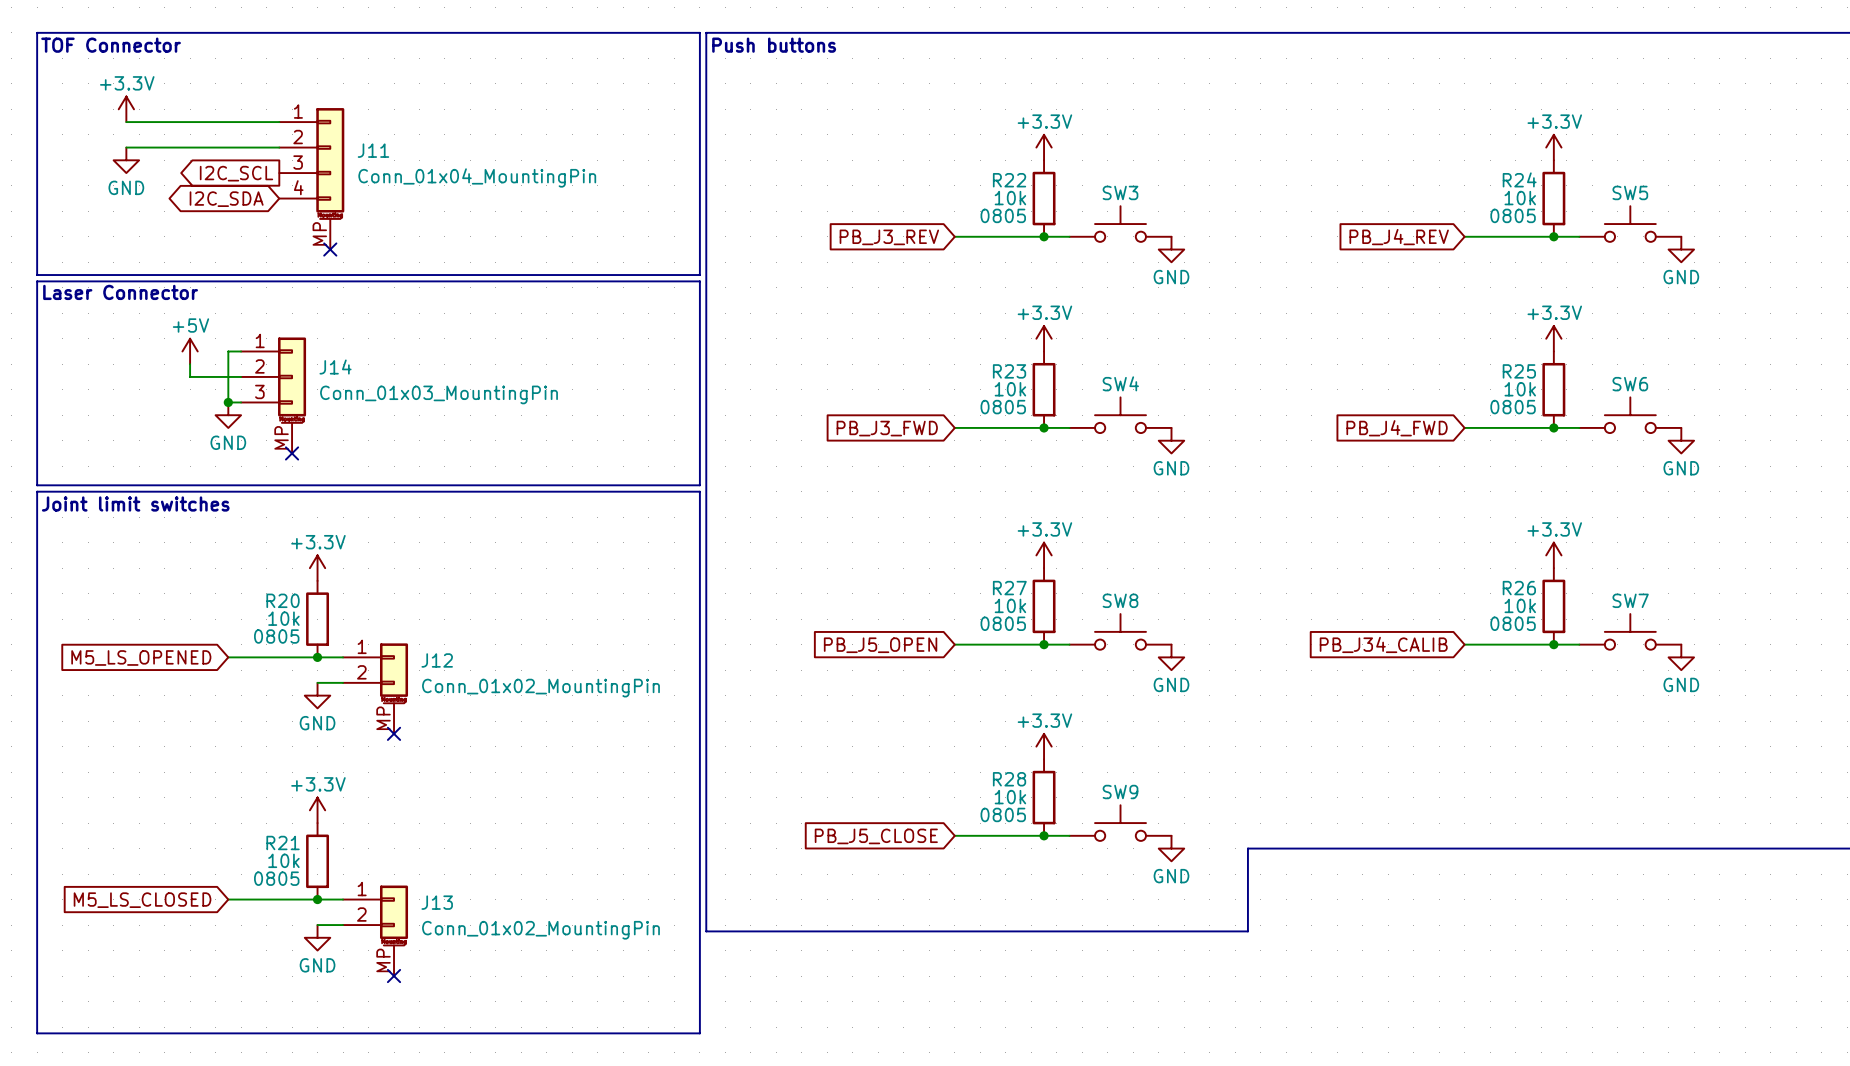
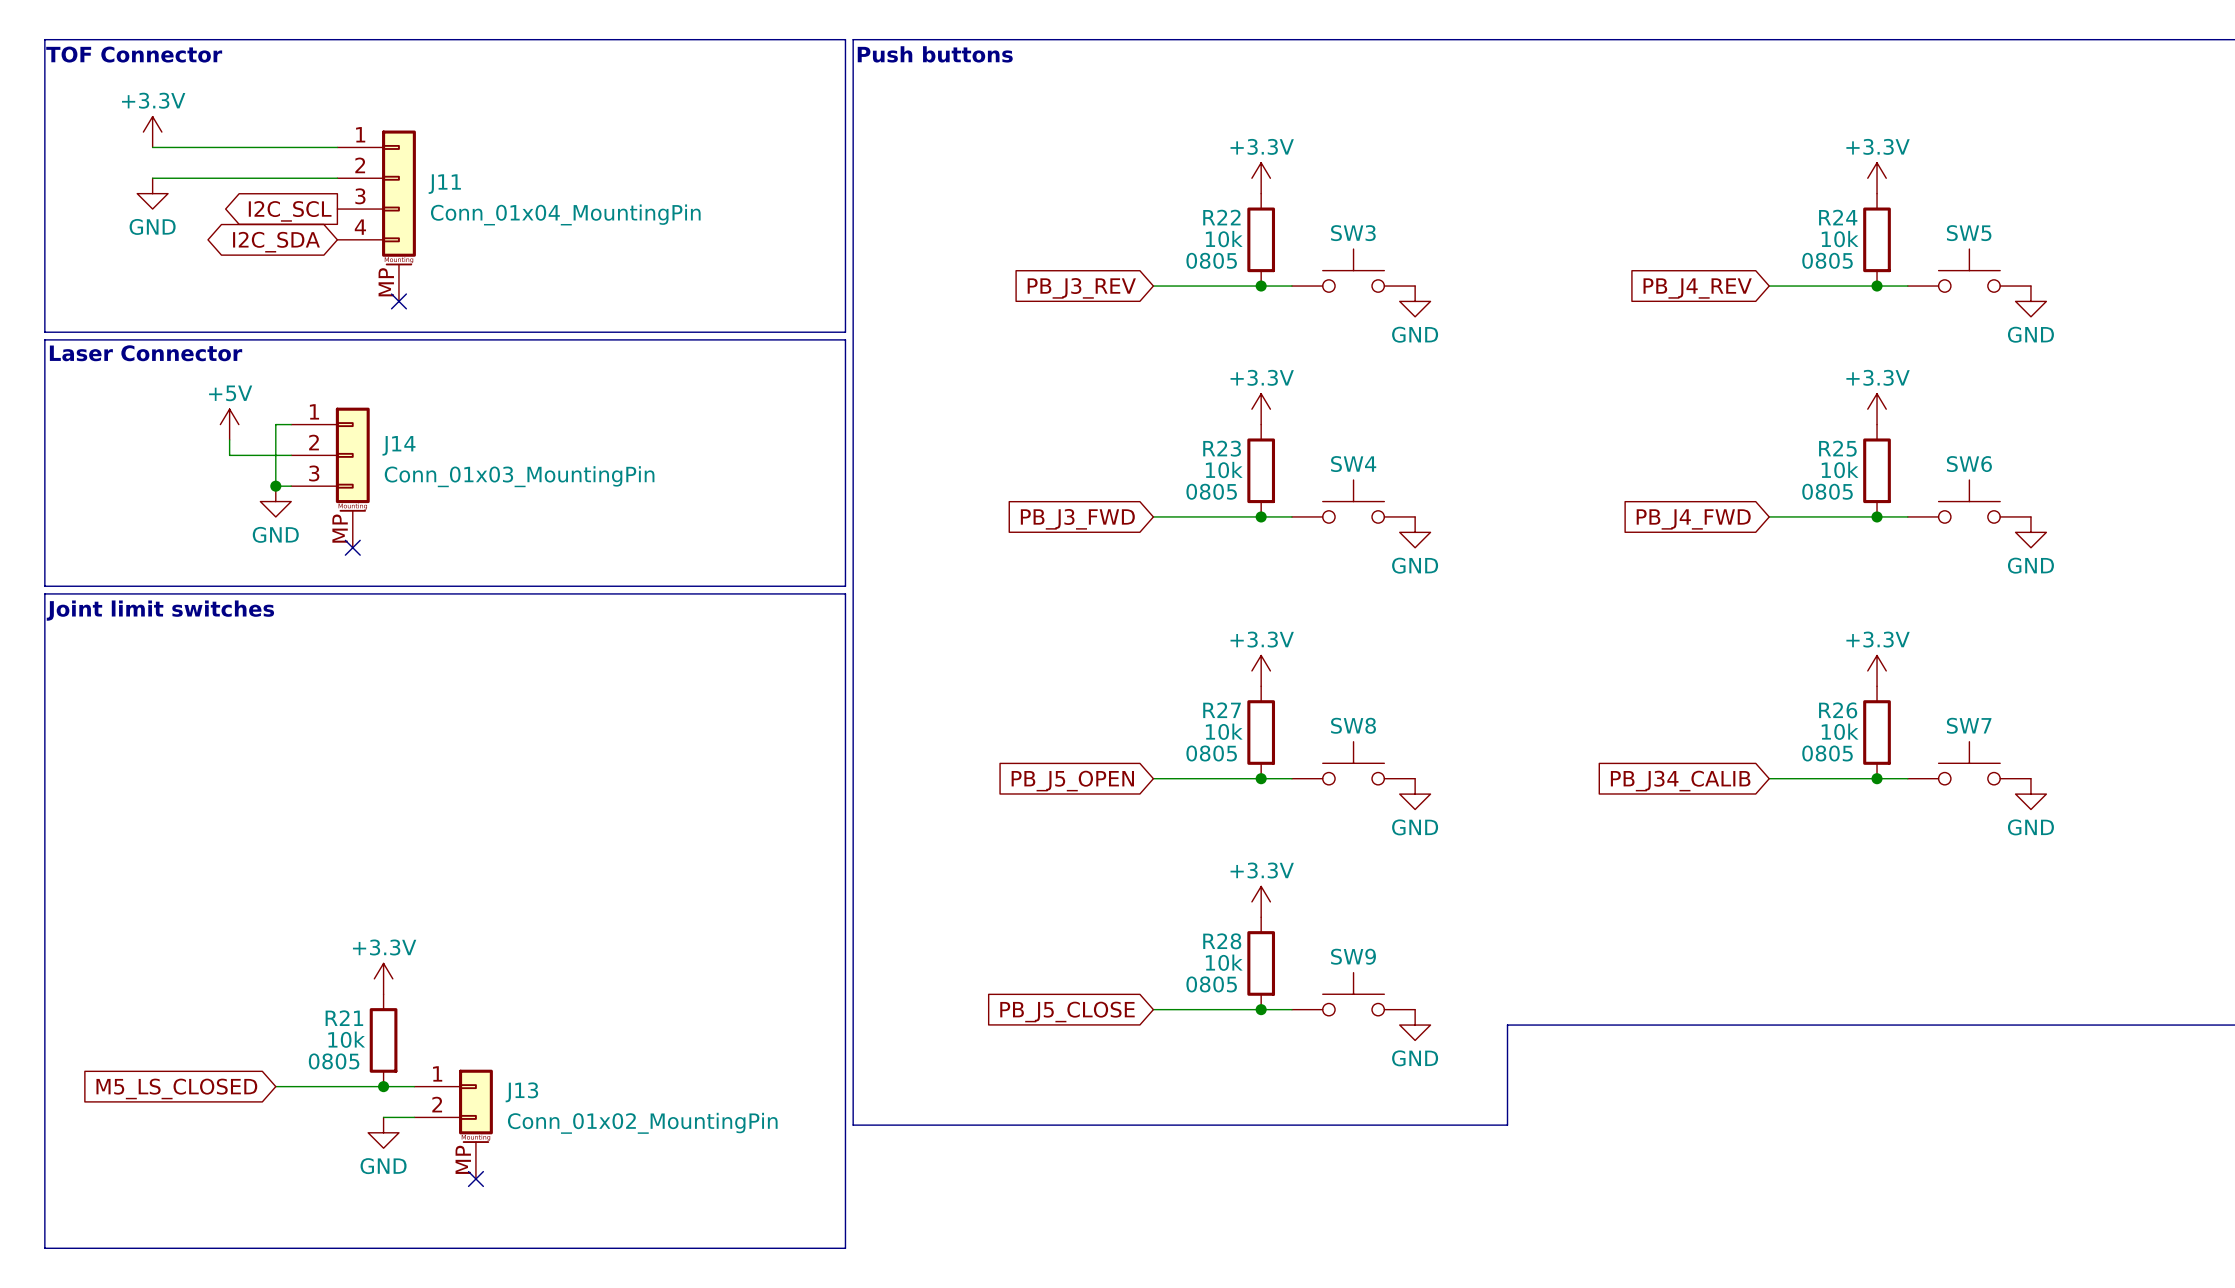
power symbol: +3.3V (317, 568) -> none
R20: 10k (317, 619) -> none
global label: M5_LS_OPENED (141, 657) -> none
wire: (228, 657) (343, 657) -> none
junction: (317, 657) -> none
wire: (317, 682) (343, 682) -> none
J12: Conn_01x02_MountingPin (375, 688) -> none
power symbol: GND (317, 695) -> none
no-connect mark: (394, 733) -> none

